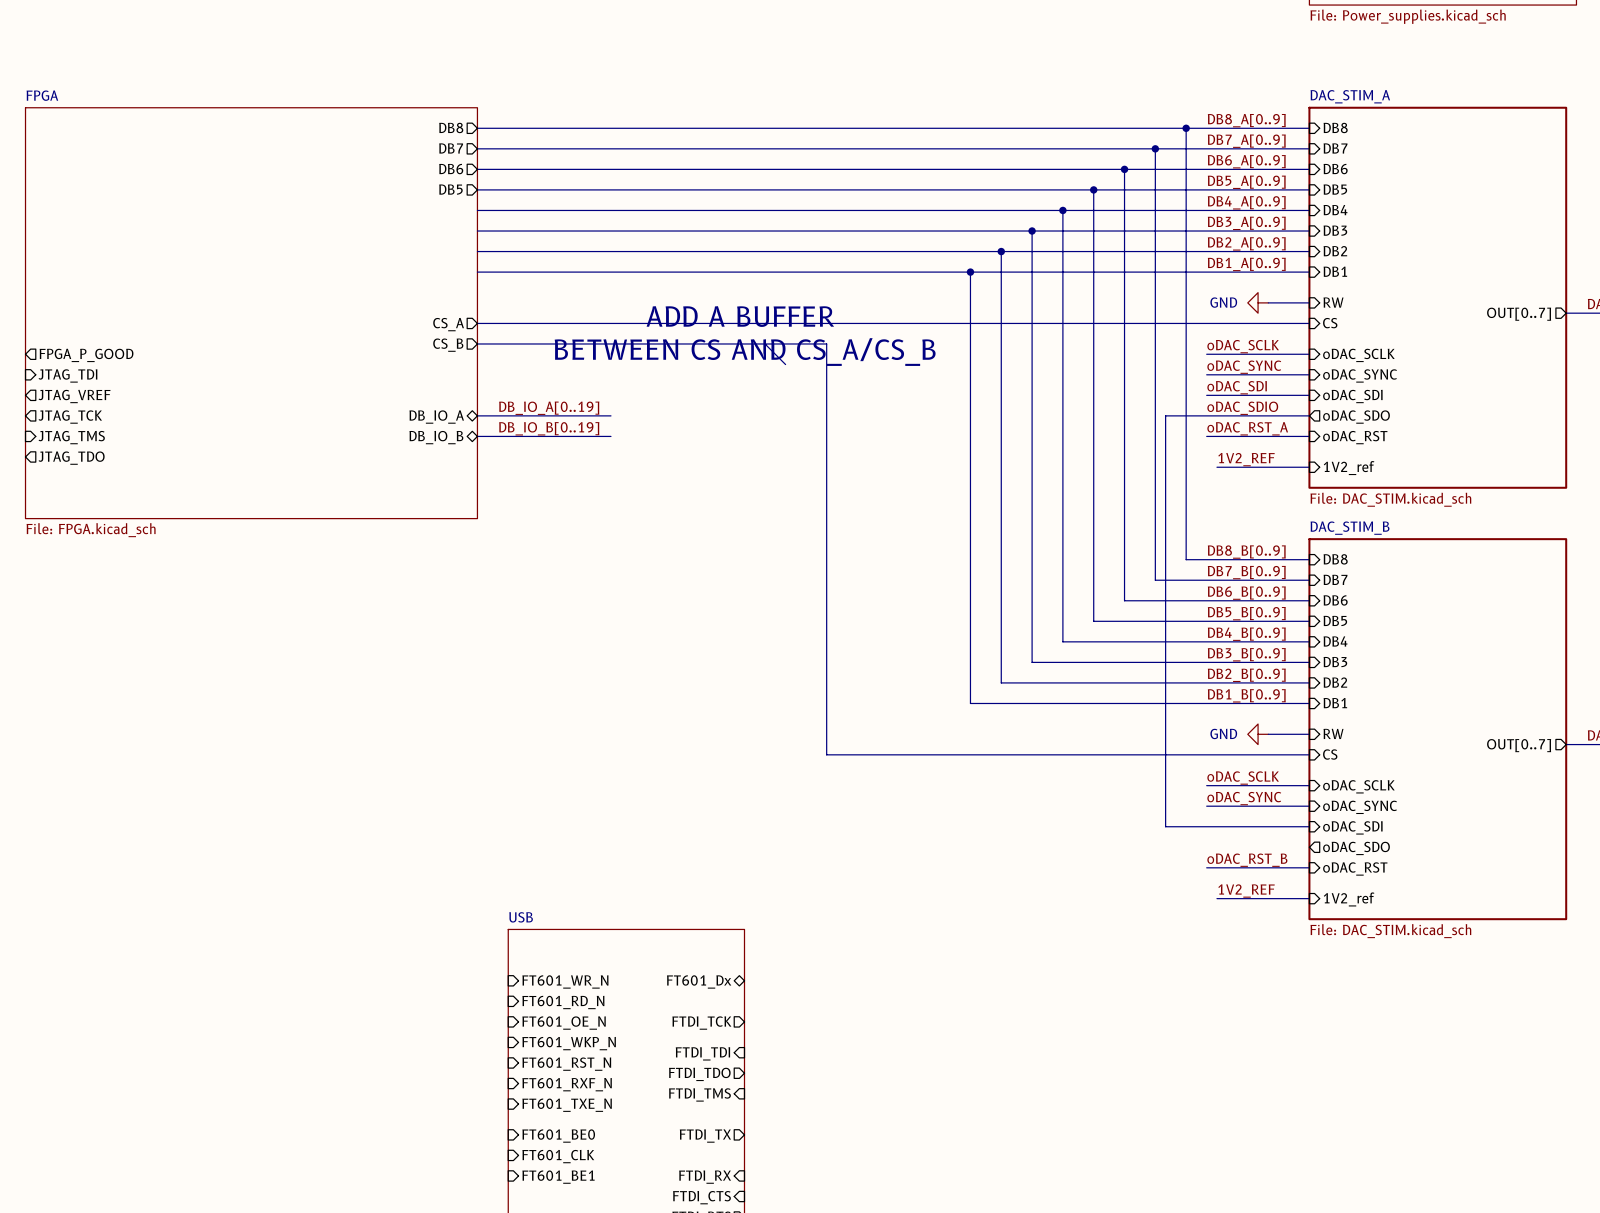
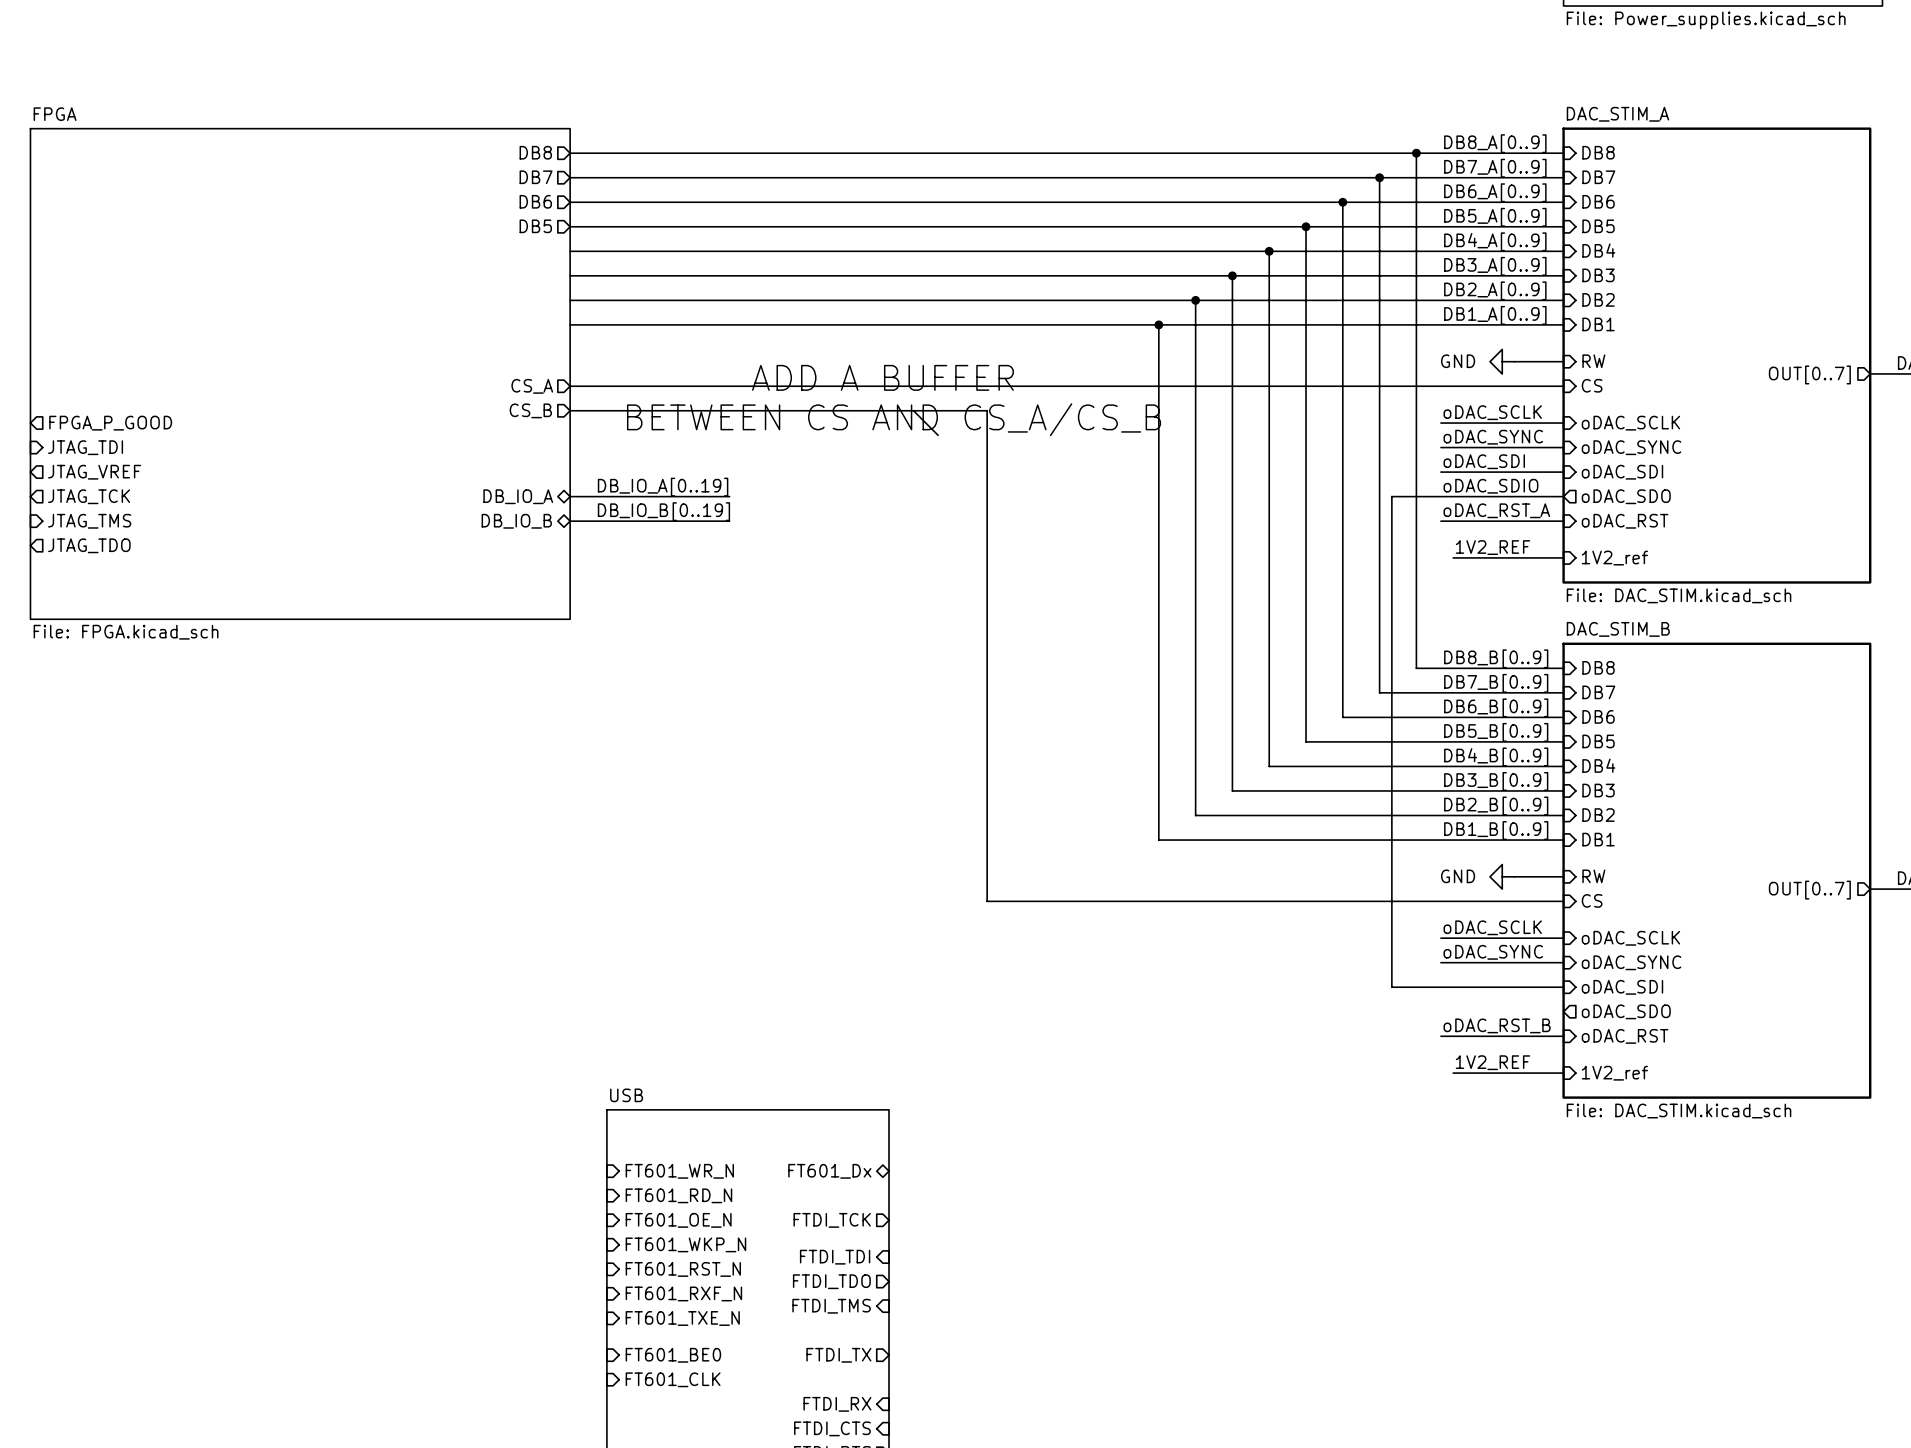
sheet pin: FT601_BE1 (558, 1177) -> none

